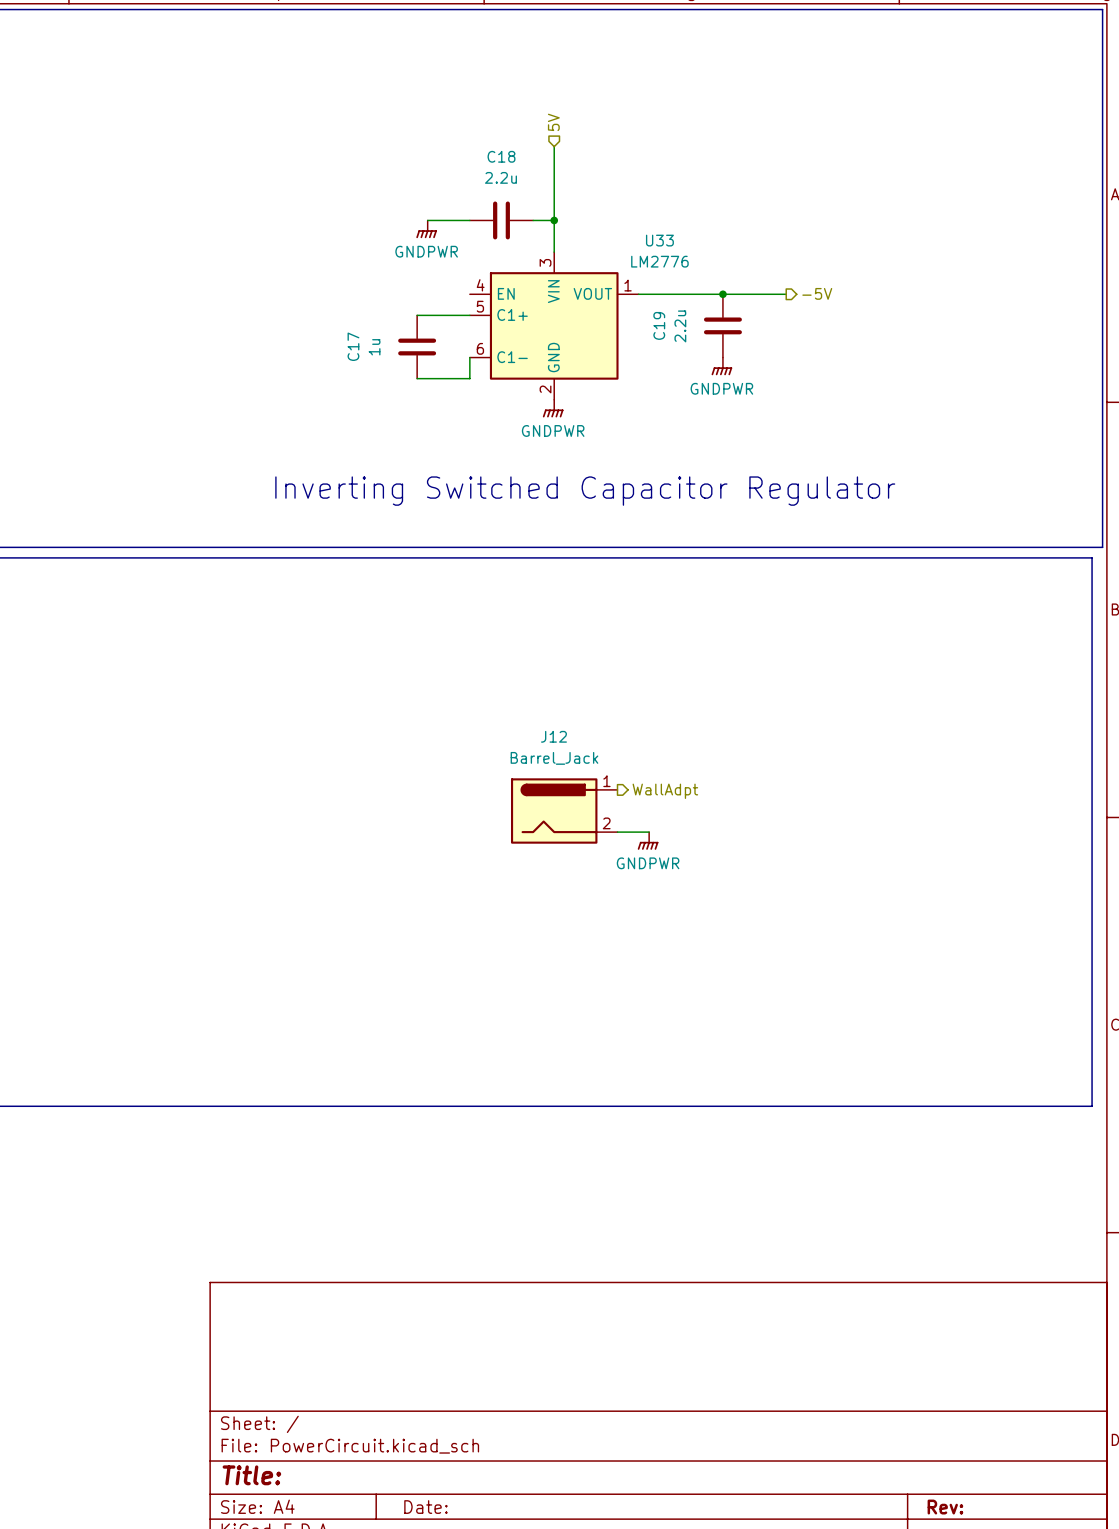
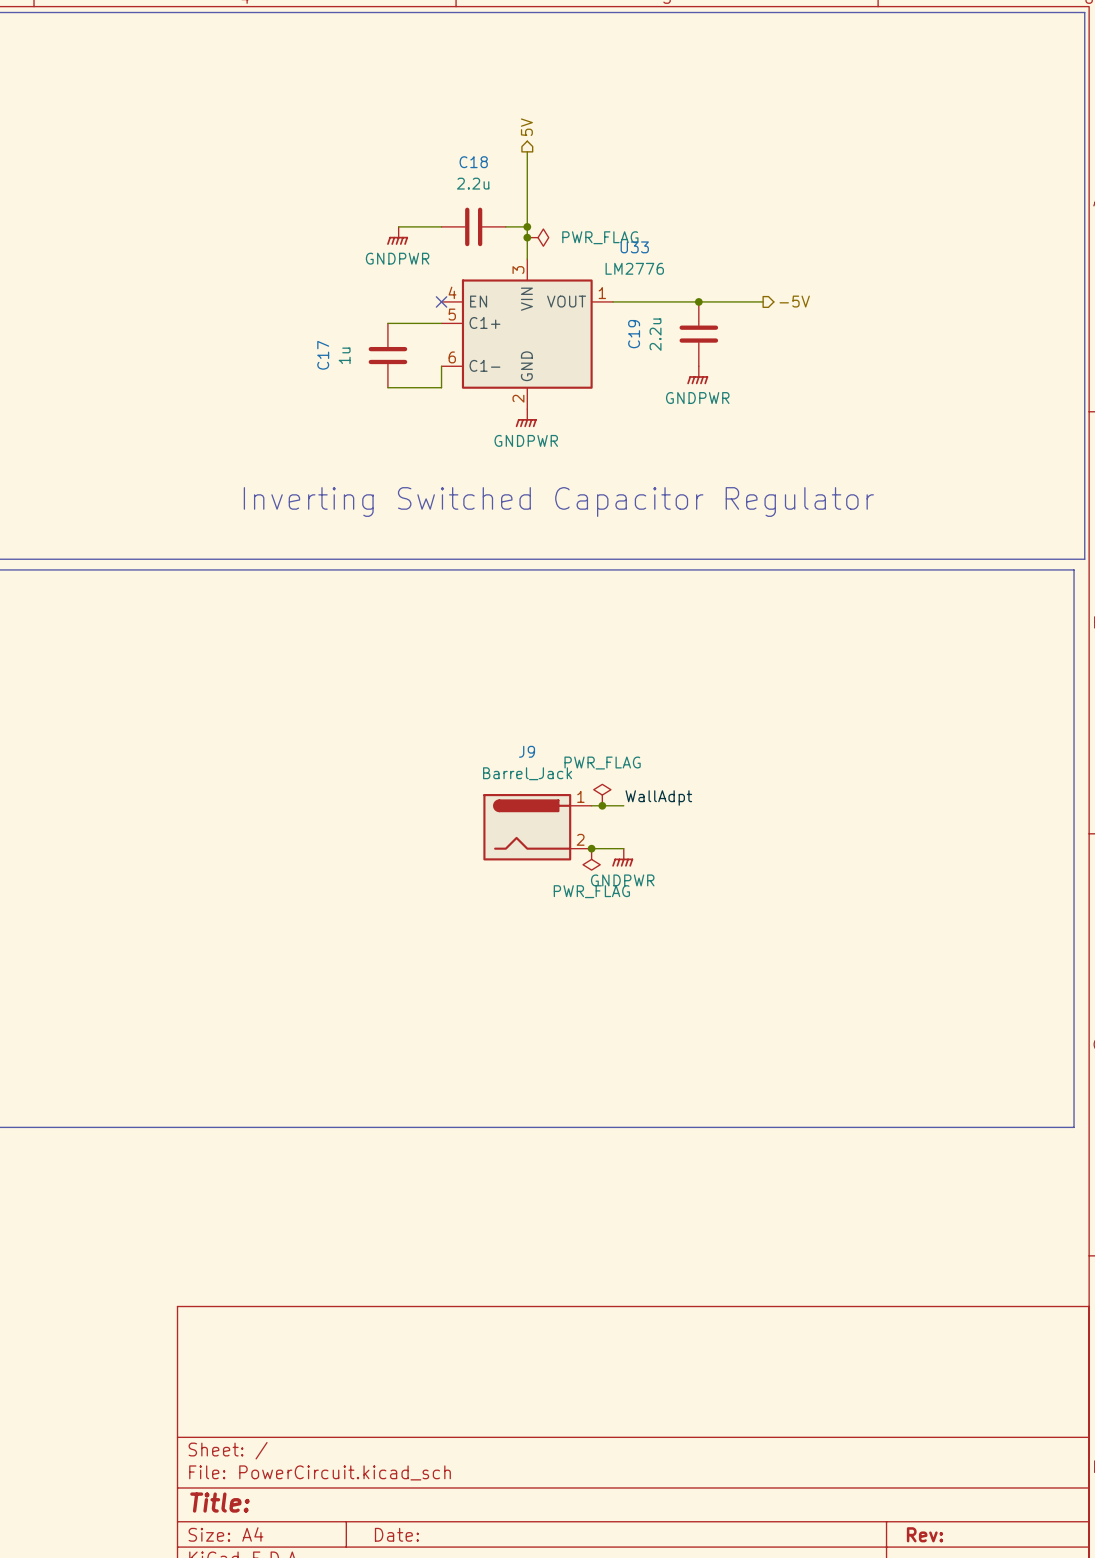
hierarchical label shape: input (553, 122) -> output (526, 127)
junction: none -> (527, 237)
power symbol: none -> PWR_FLAG (538, 237)
no-connect mark: none -> (441, 301)
J12 name: J12 (553, 736) -> J9 (527, 751)
power symbol: none -> PWR_FLAG (602, 795)
label: none -> WallAdpt (658, 798)
wire: none -> (591, 805) (623, 805)
junction: none -> (602, 805)
hierarchical label: WallAdpt (665, 791) -> none
junction: none -> (591, 848)
power symbol: none -> PWR_FLAG (591, 859)

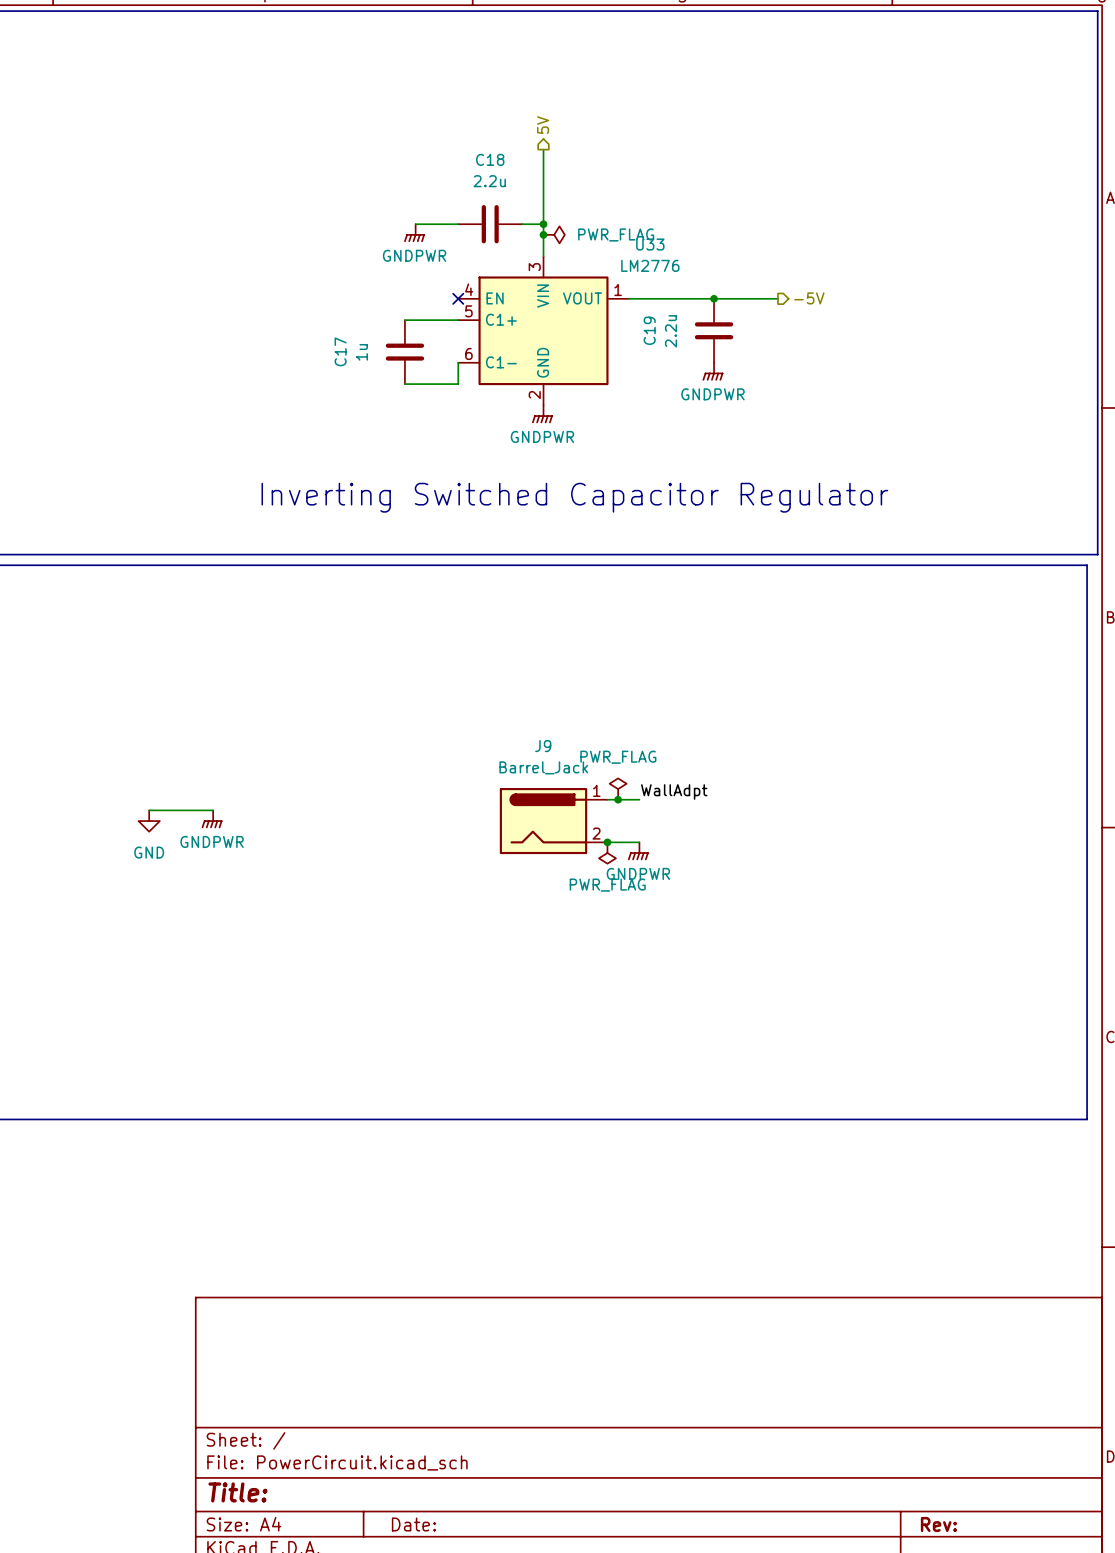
wire: none -> (149, 810) (213, 810)
power symbol: none -> GNDPWR (212, 819)
power symbol: none -> GND (149, 821)

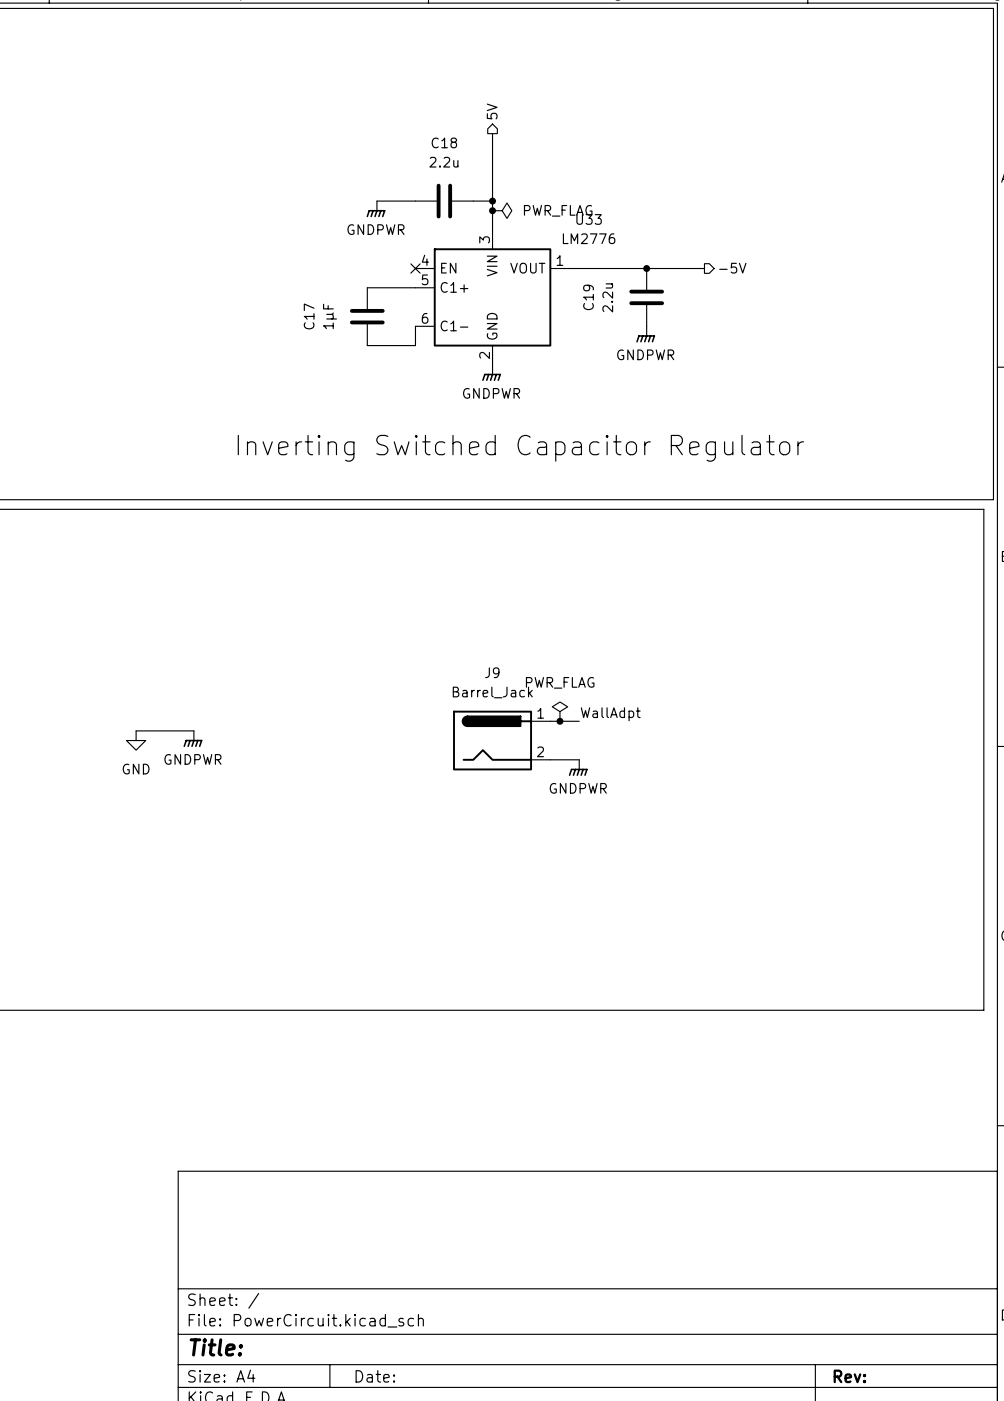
C17 value: 1u (361, 352) -> 1µF (330, 316)
junction: (607, 842) -> none
power symbol: PWR_FLAG (607, 853) -> none

